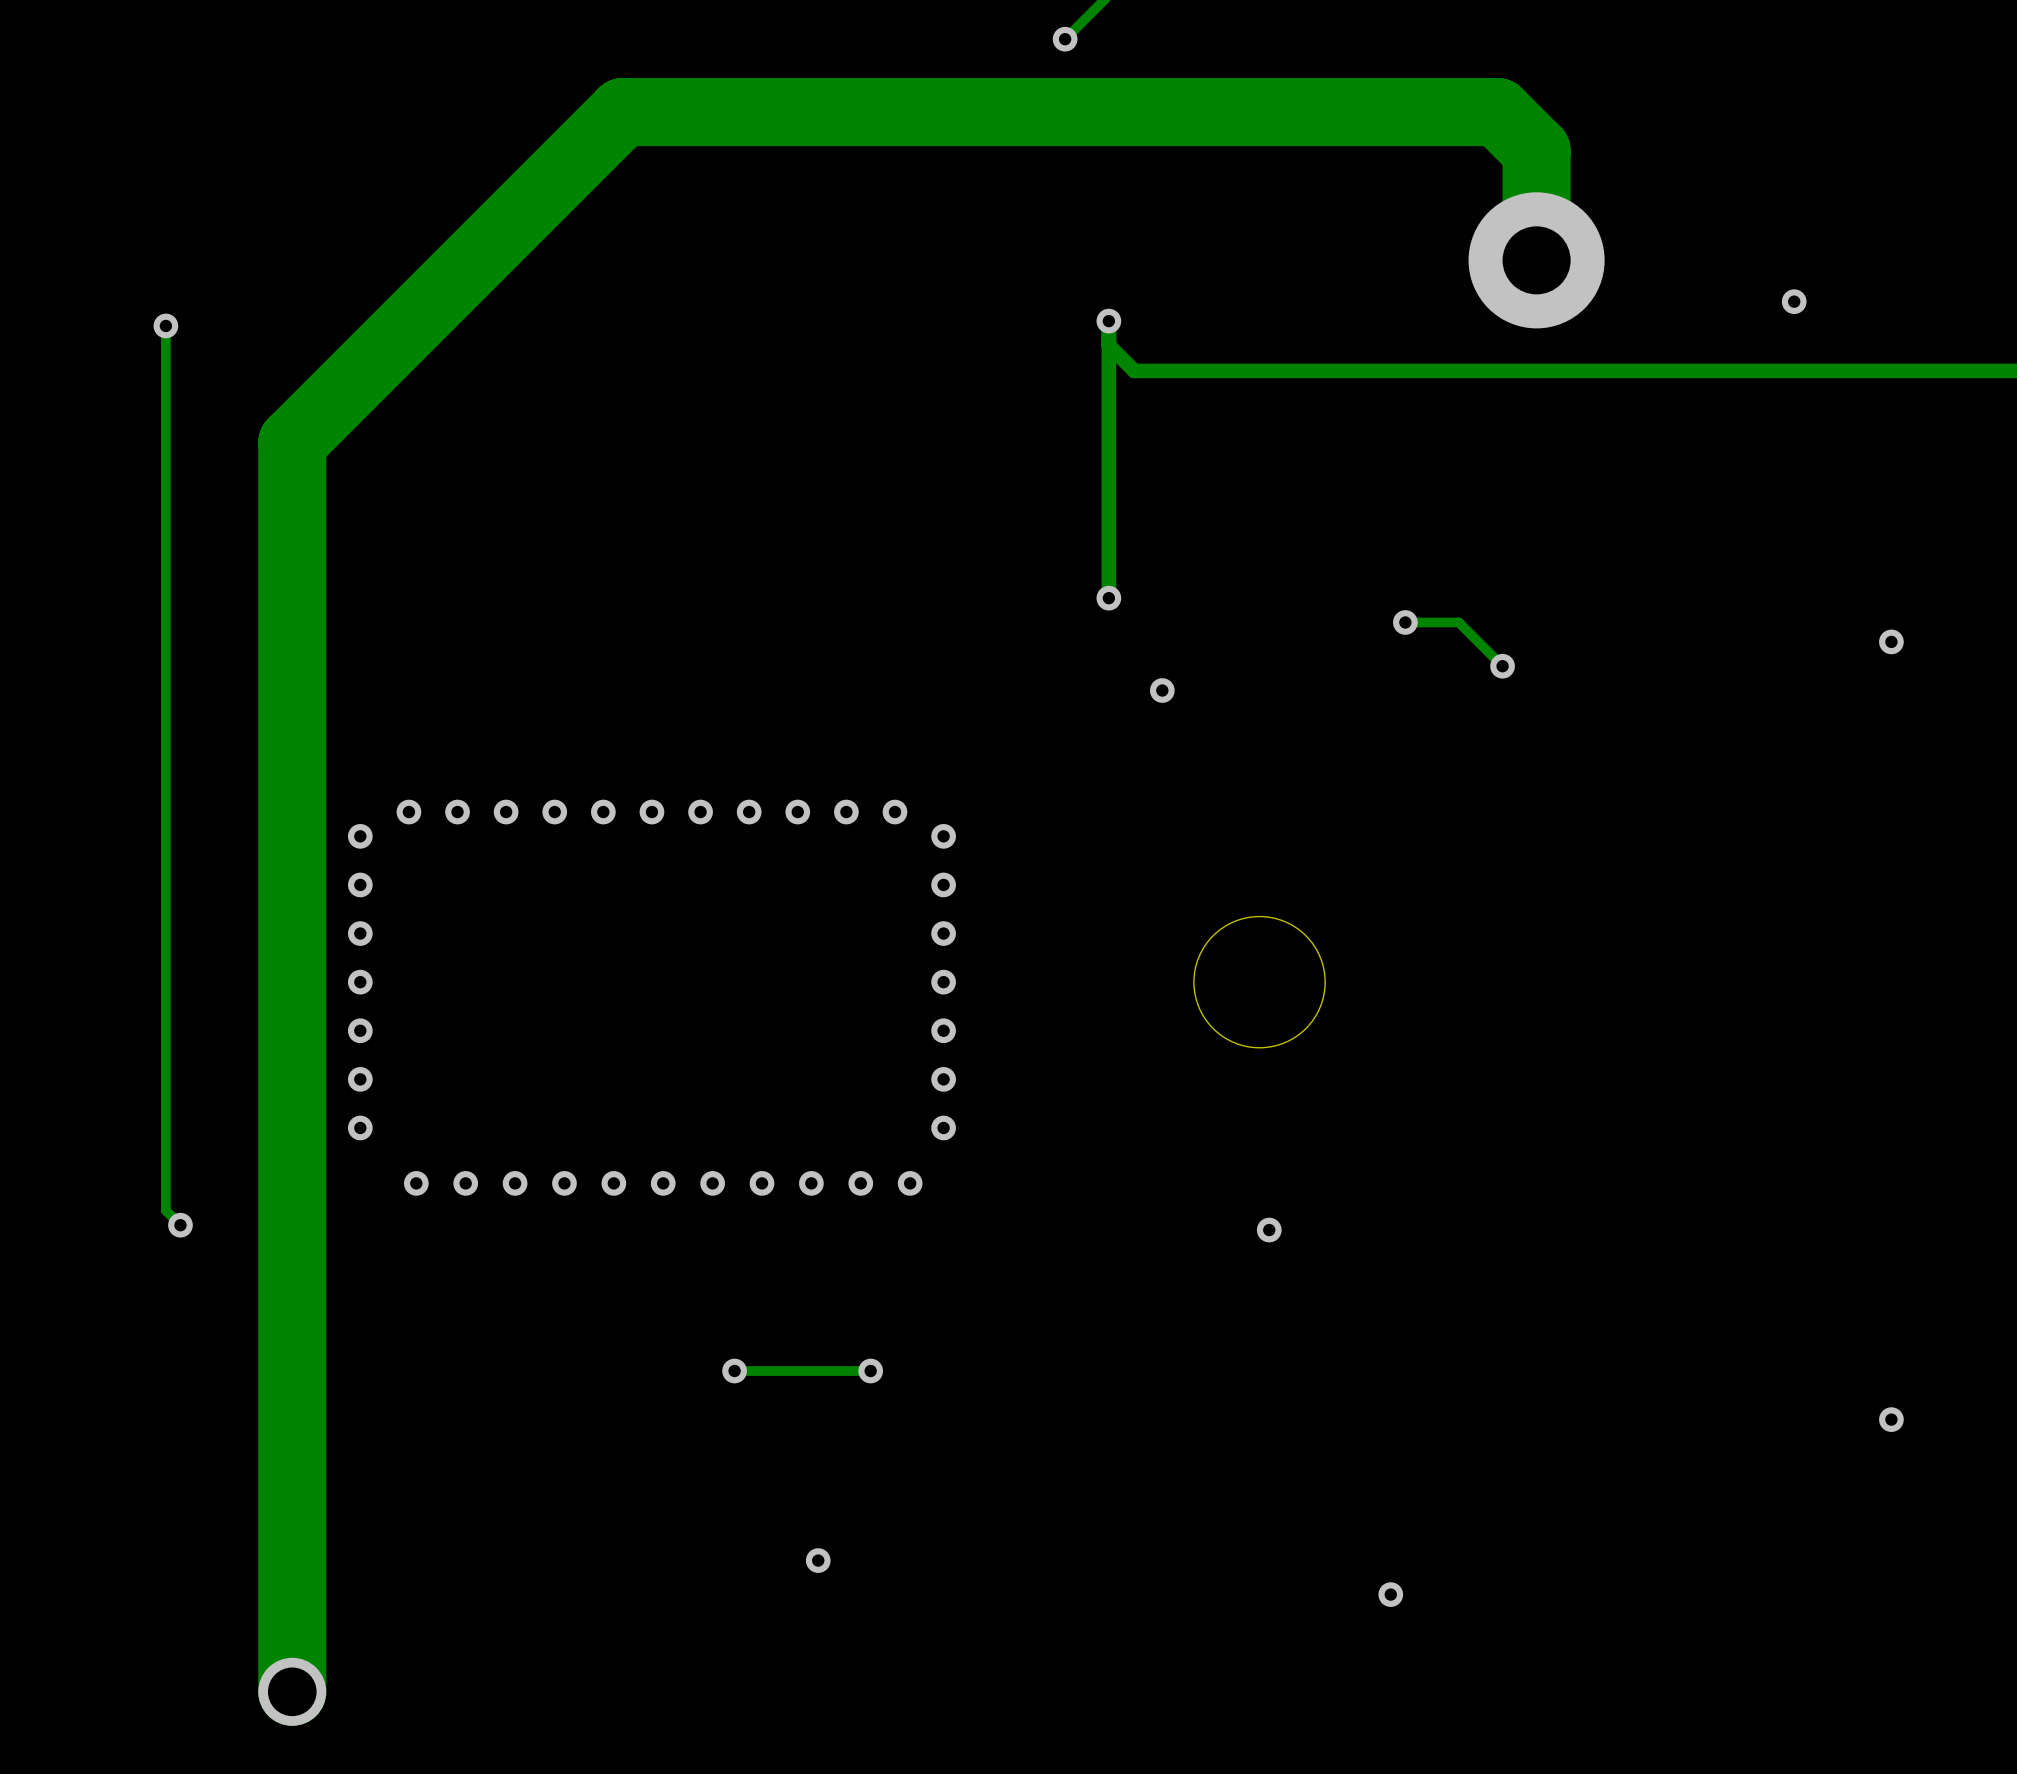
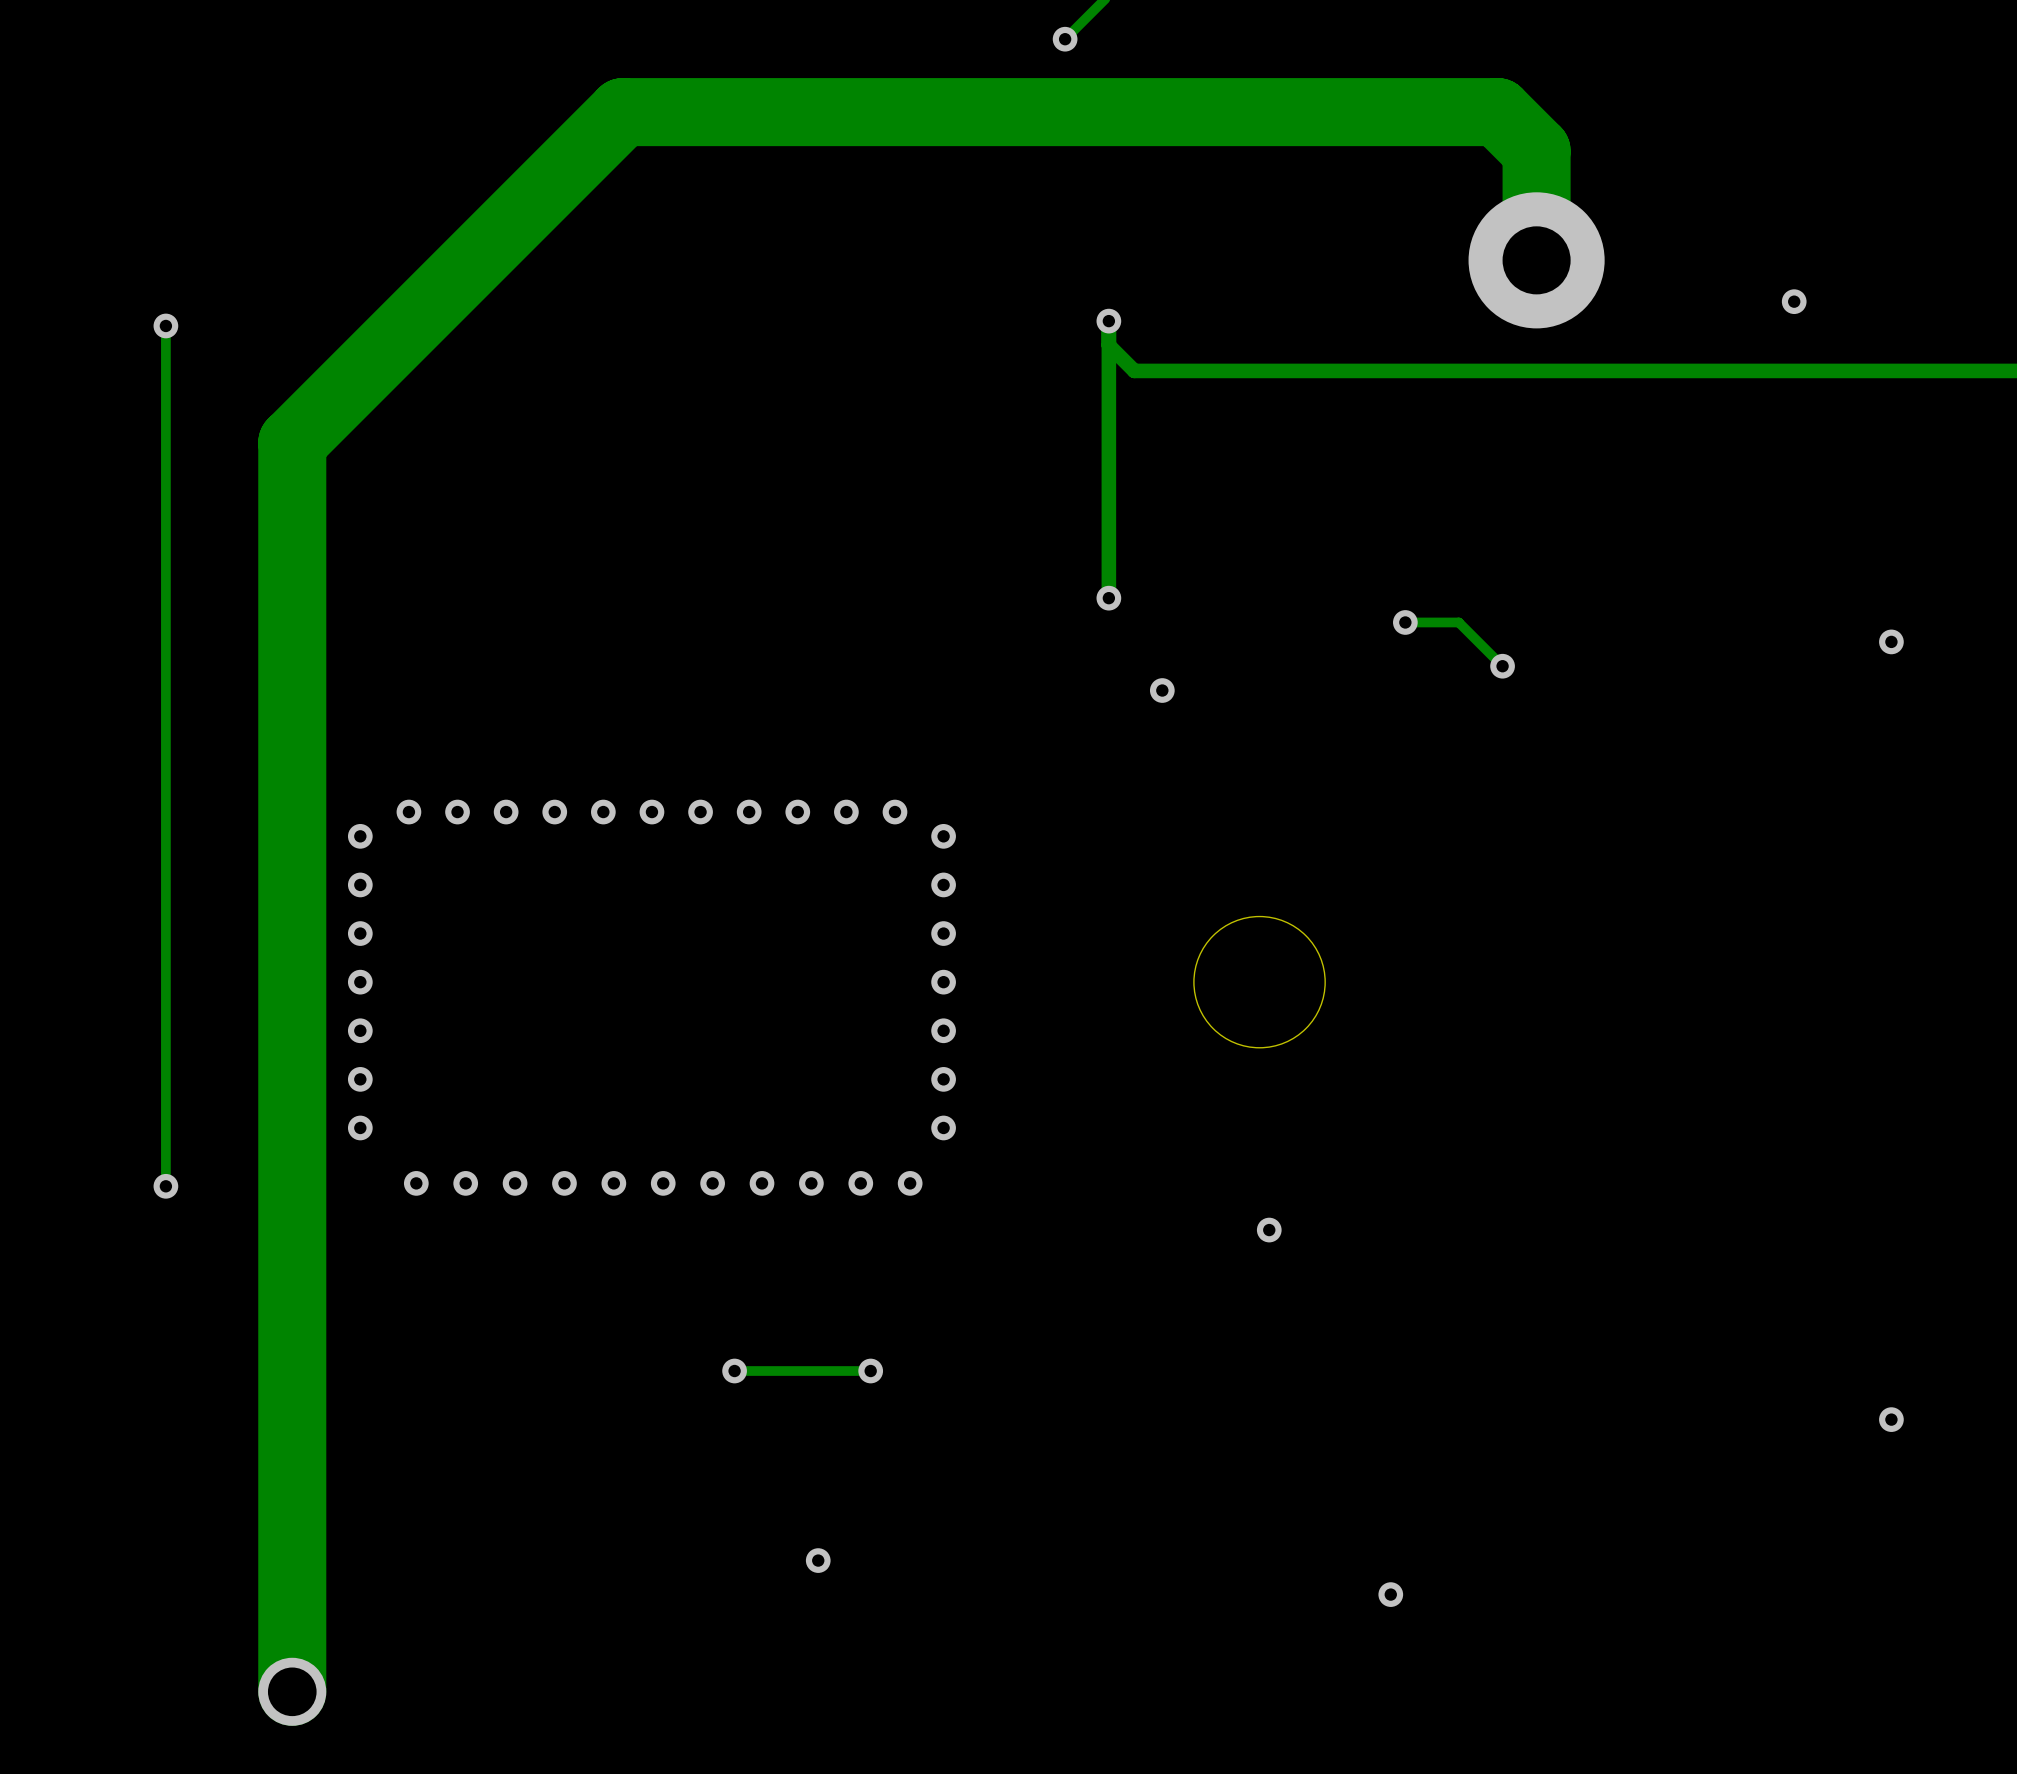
track: (165, 1186) (165, 1210) (180, 1225) -> none
via position: (180, 1225) -> (165, 1186)

